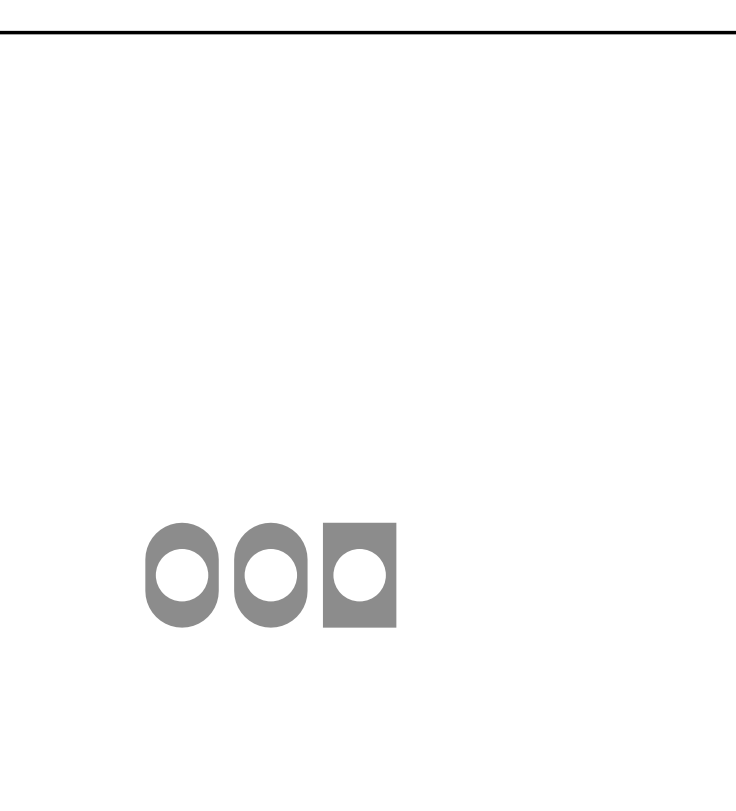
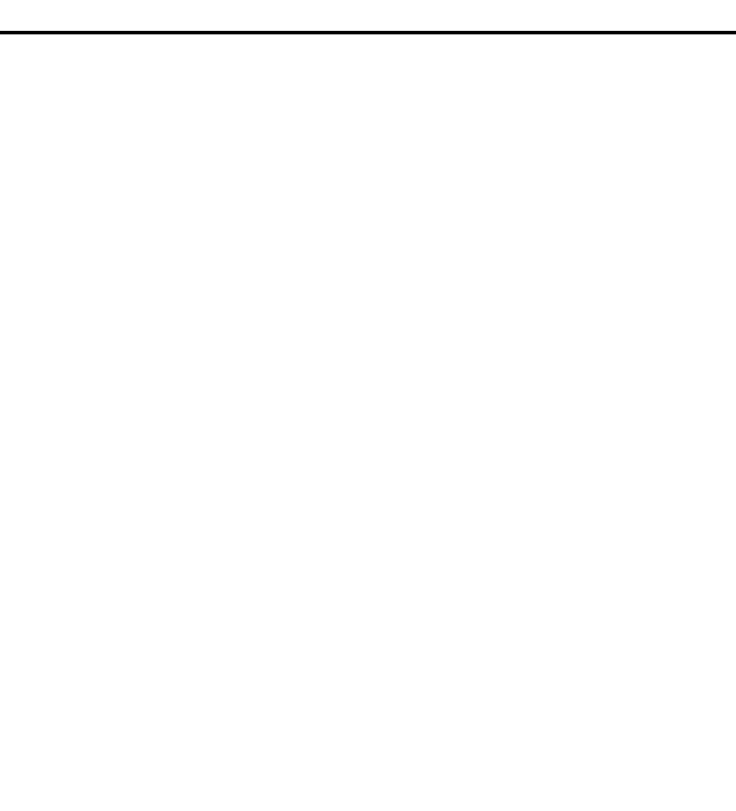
part: (270, 575) -> none

